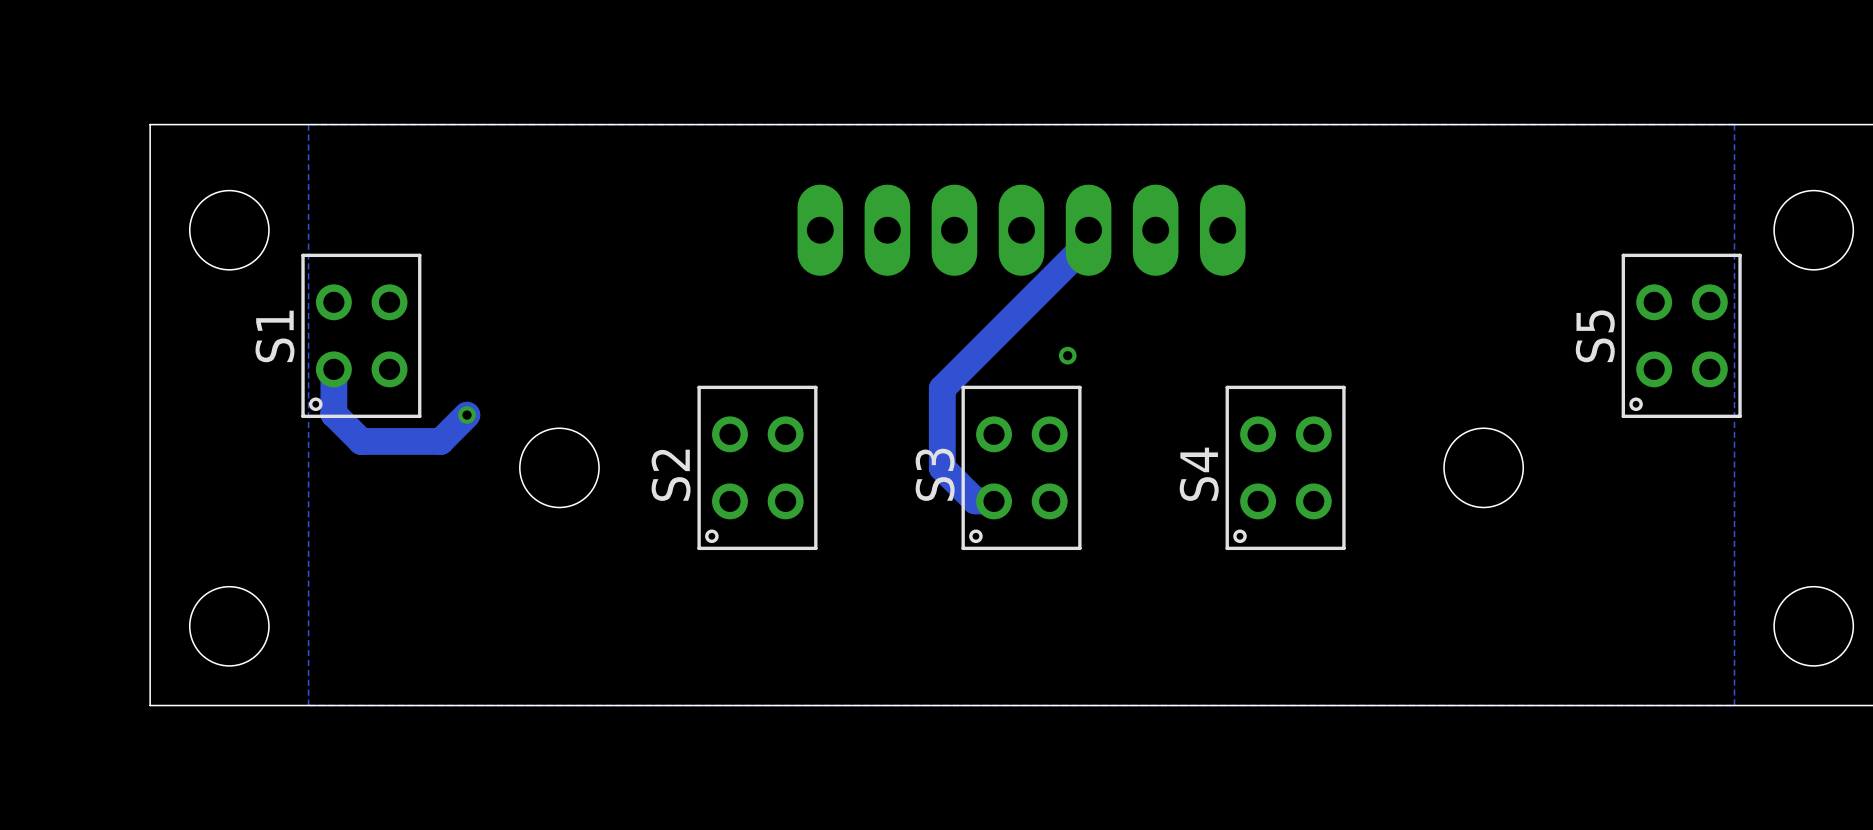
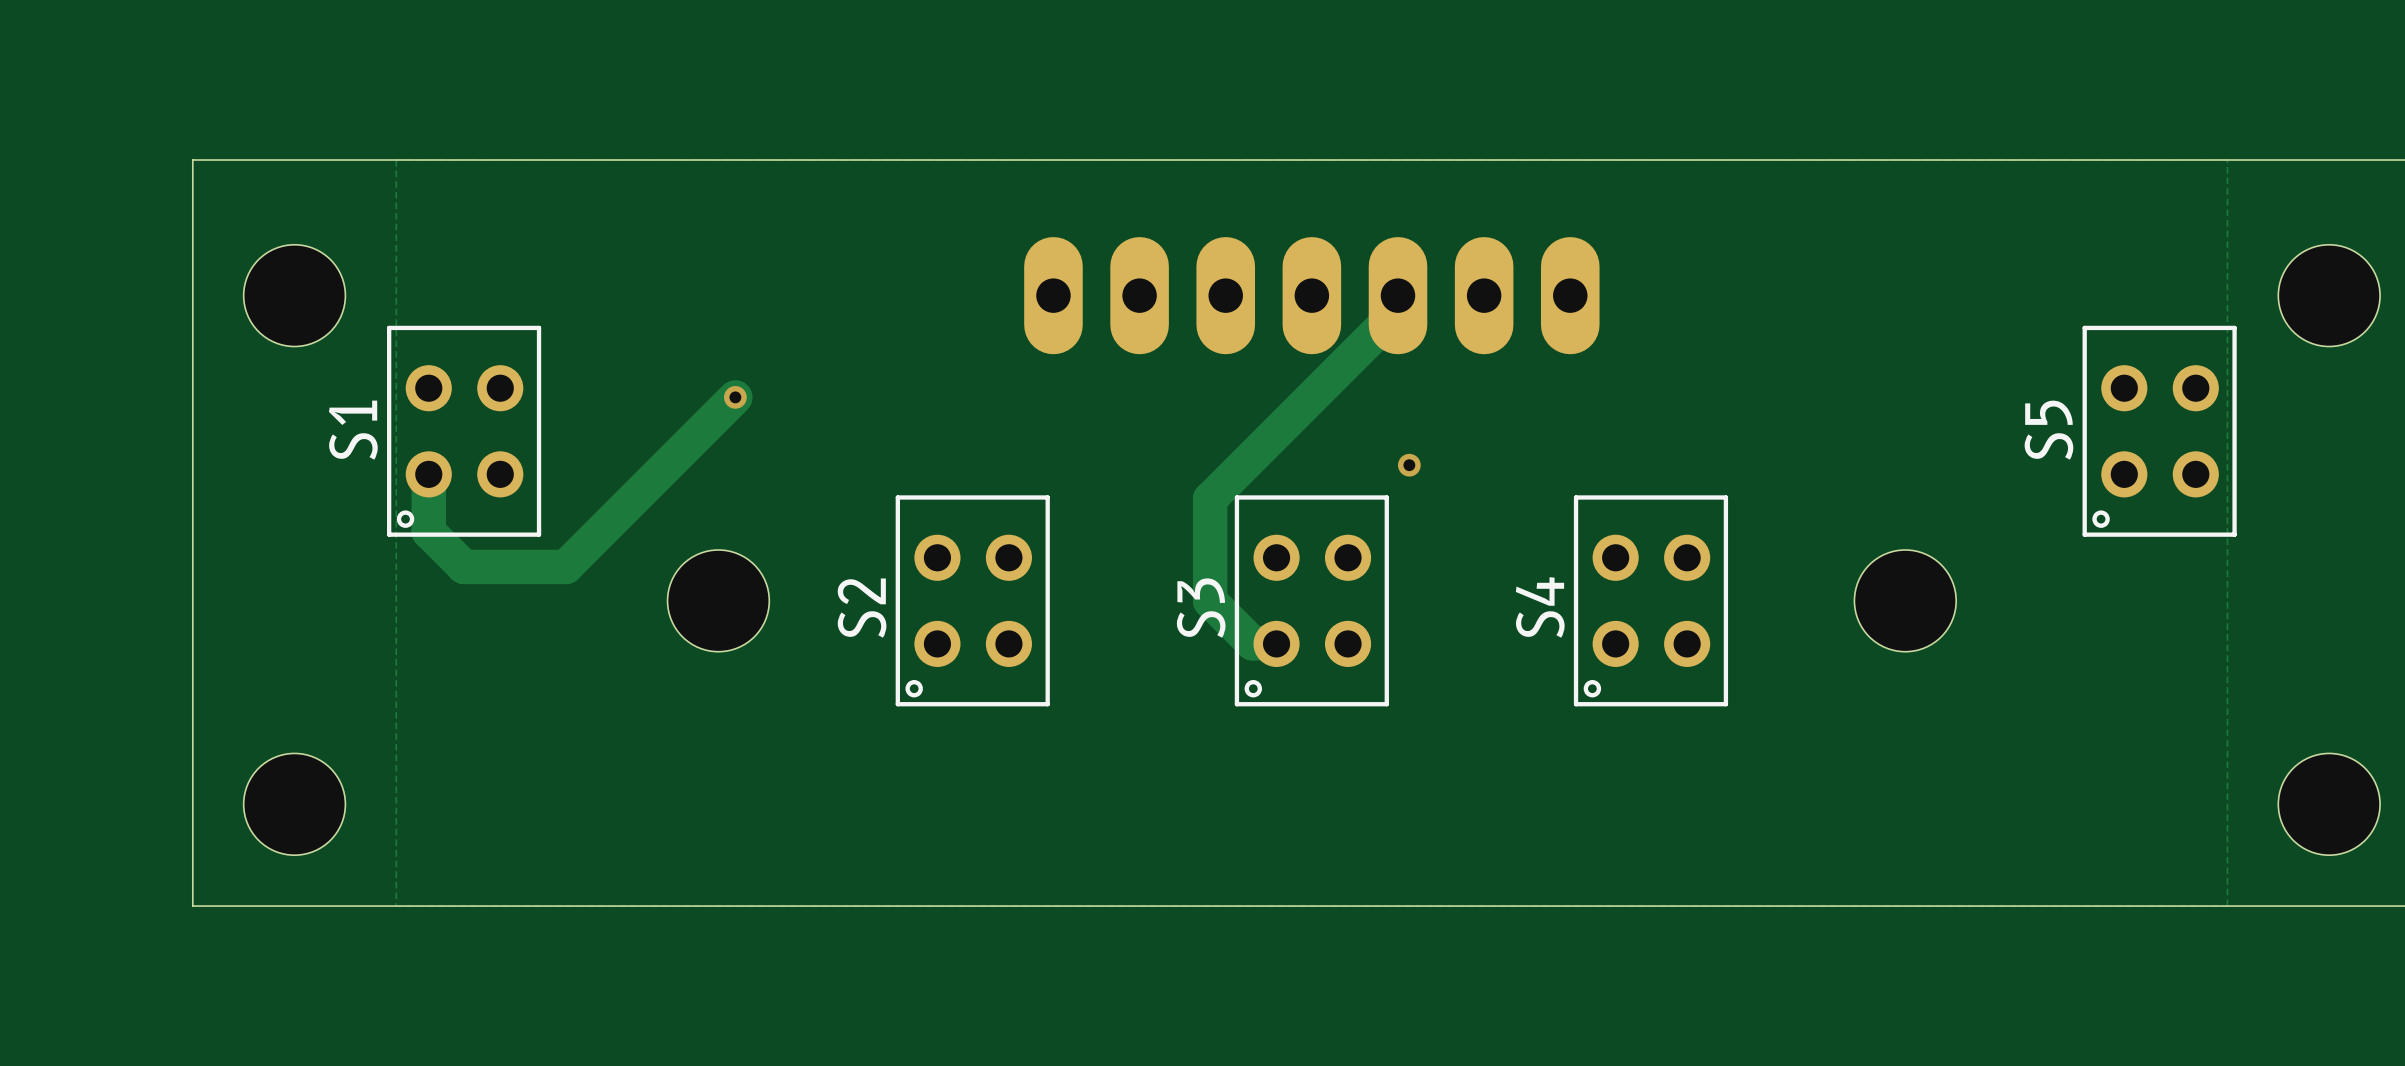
track: none -> (735, 397) (599, 533)
via position: (1067, 355) -> (1409, 465)
via position: (467, 415) -> (735, 397)

